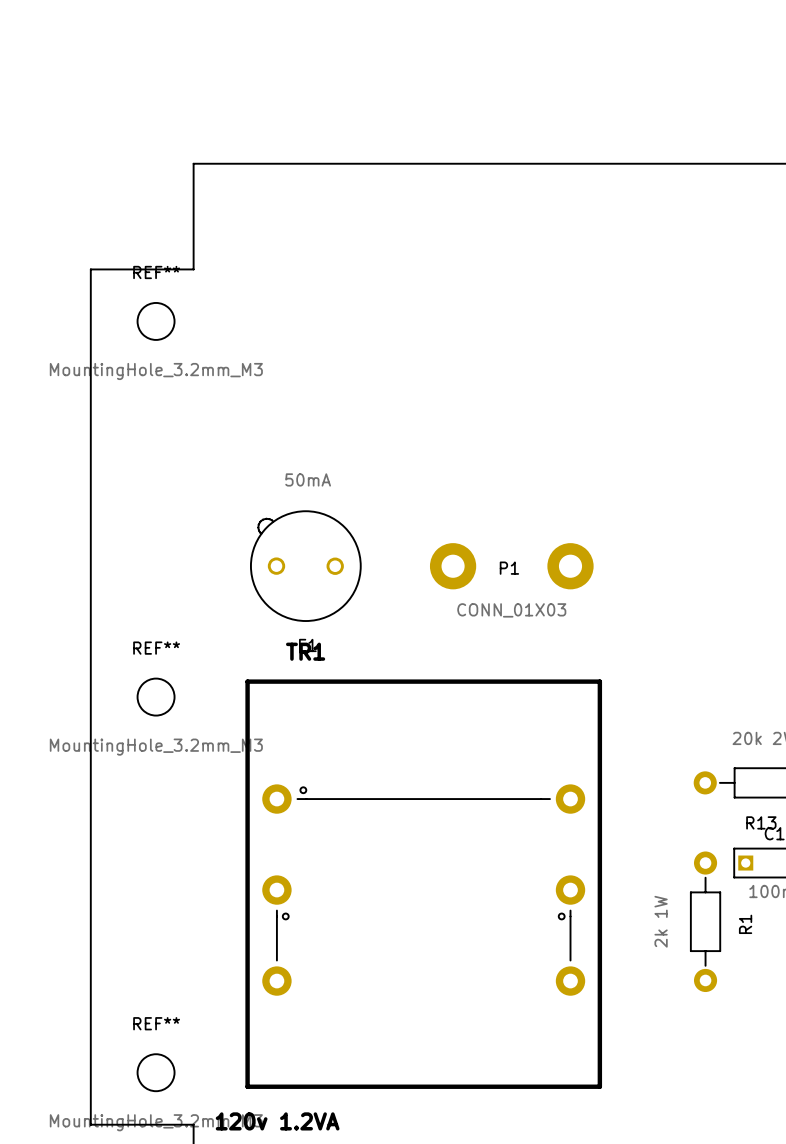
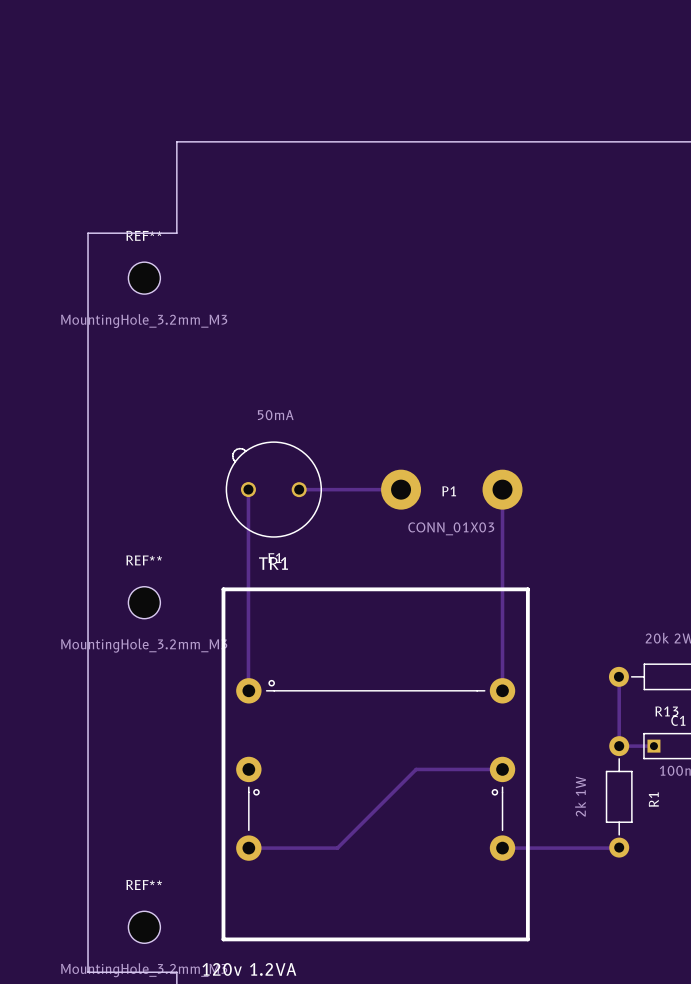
track: none -> (248, 489) (248, 690)
track: none -> (299, 489) (401, 489)
track: none -> (502, 489) (502, 690)
track: none -> (619, 676) (619, 746) (653, 746)
track: none -> (502, 769) (416, 769) (337, 848) (248, 848)
track: none -> (619, 847) (502, 848)

